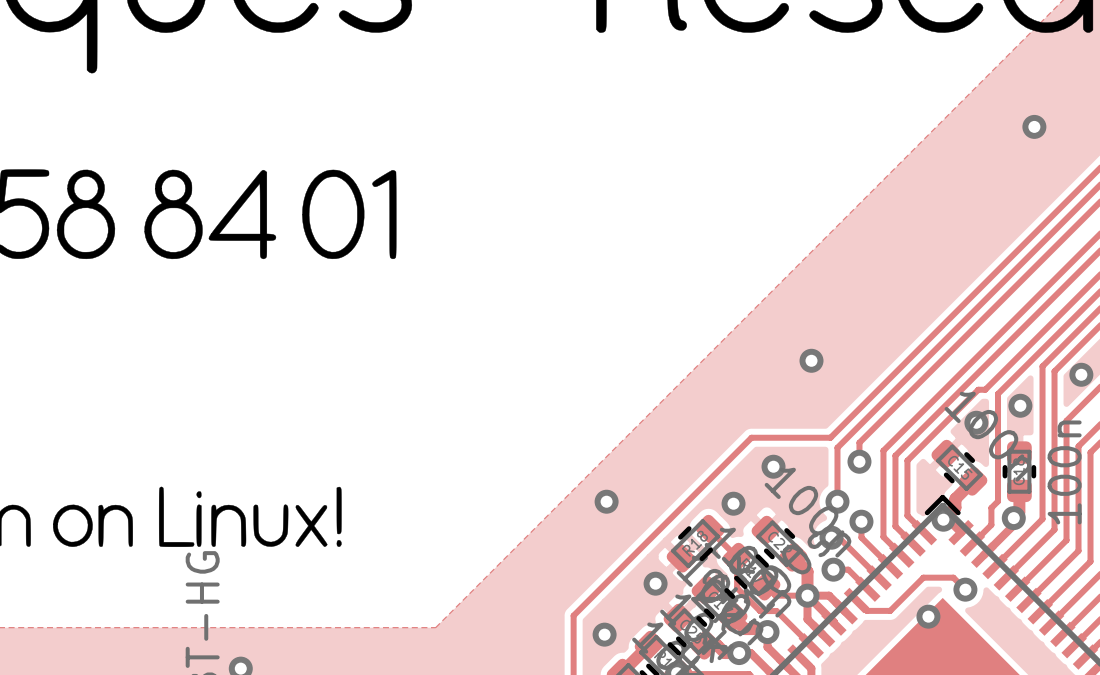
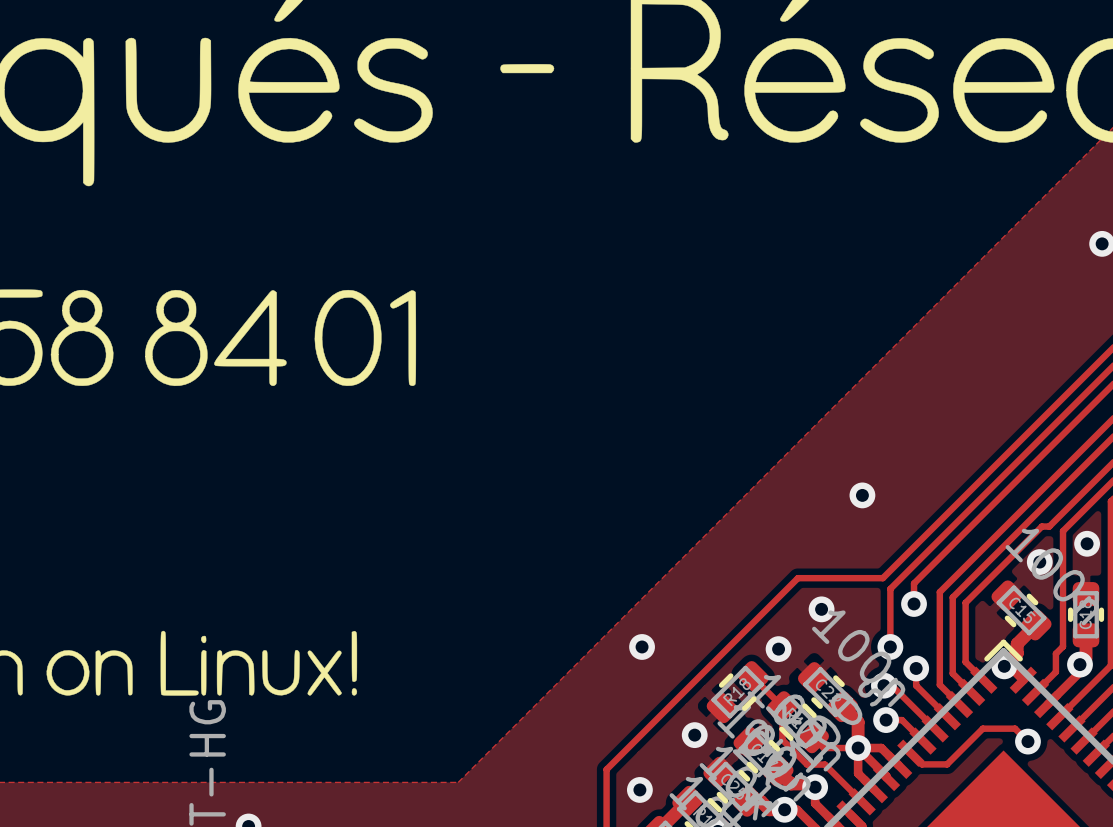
via: (928, 616) -> none

